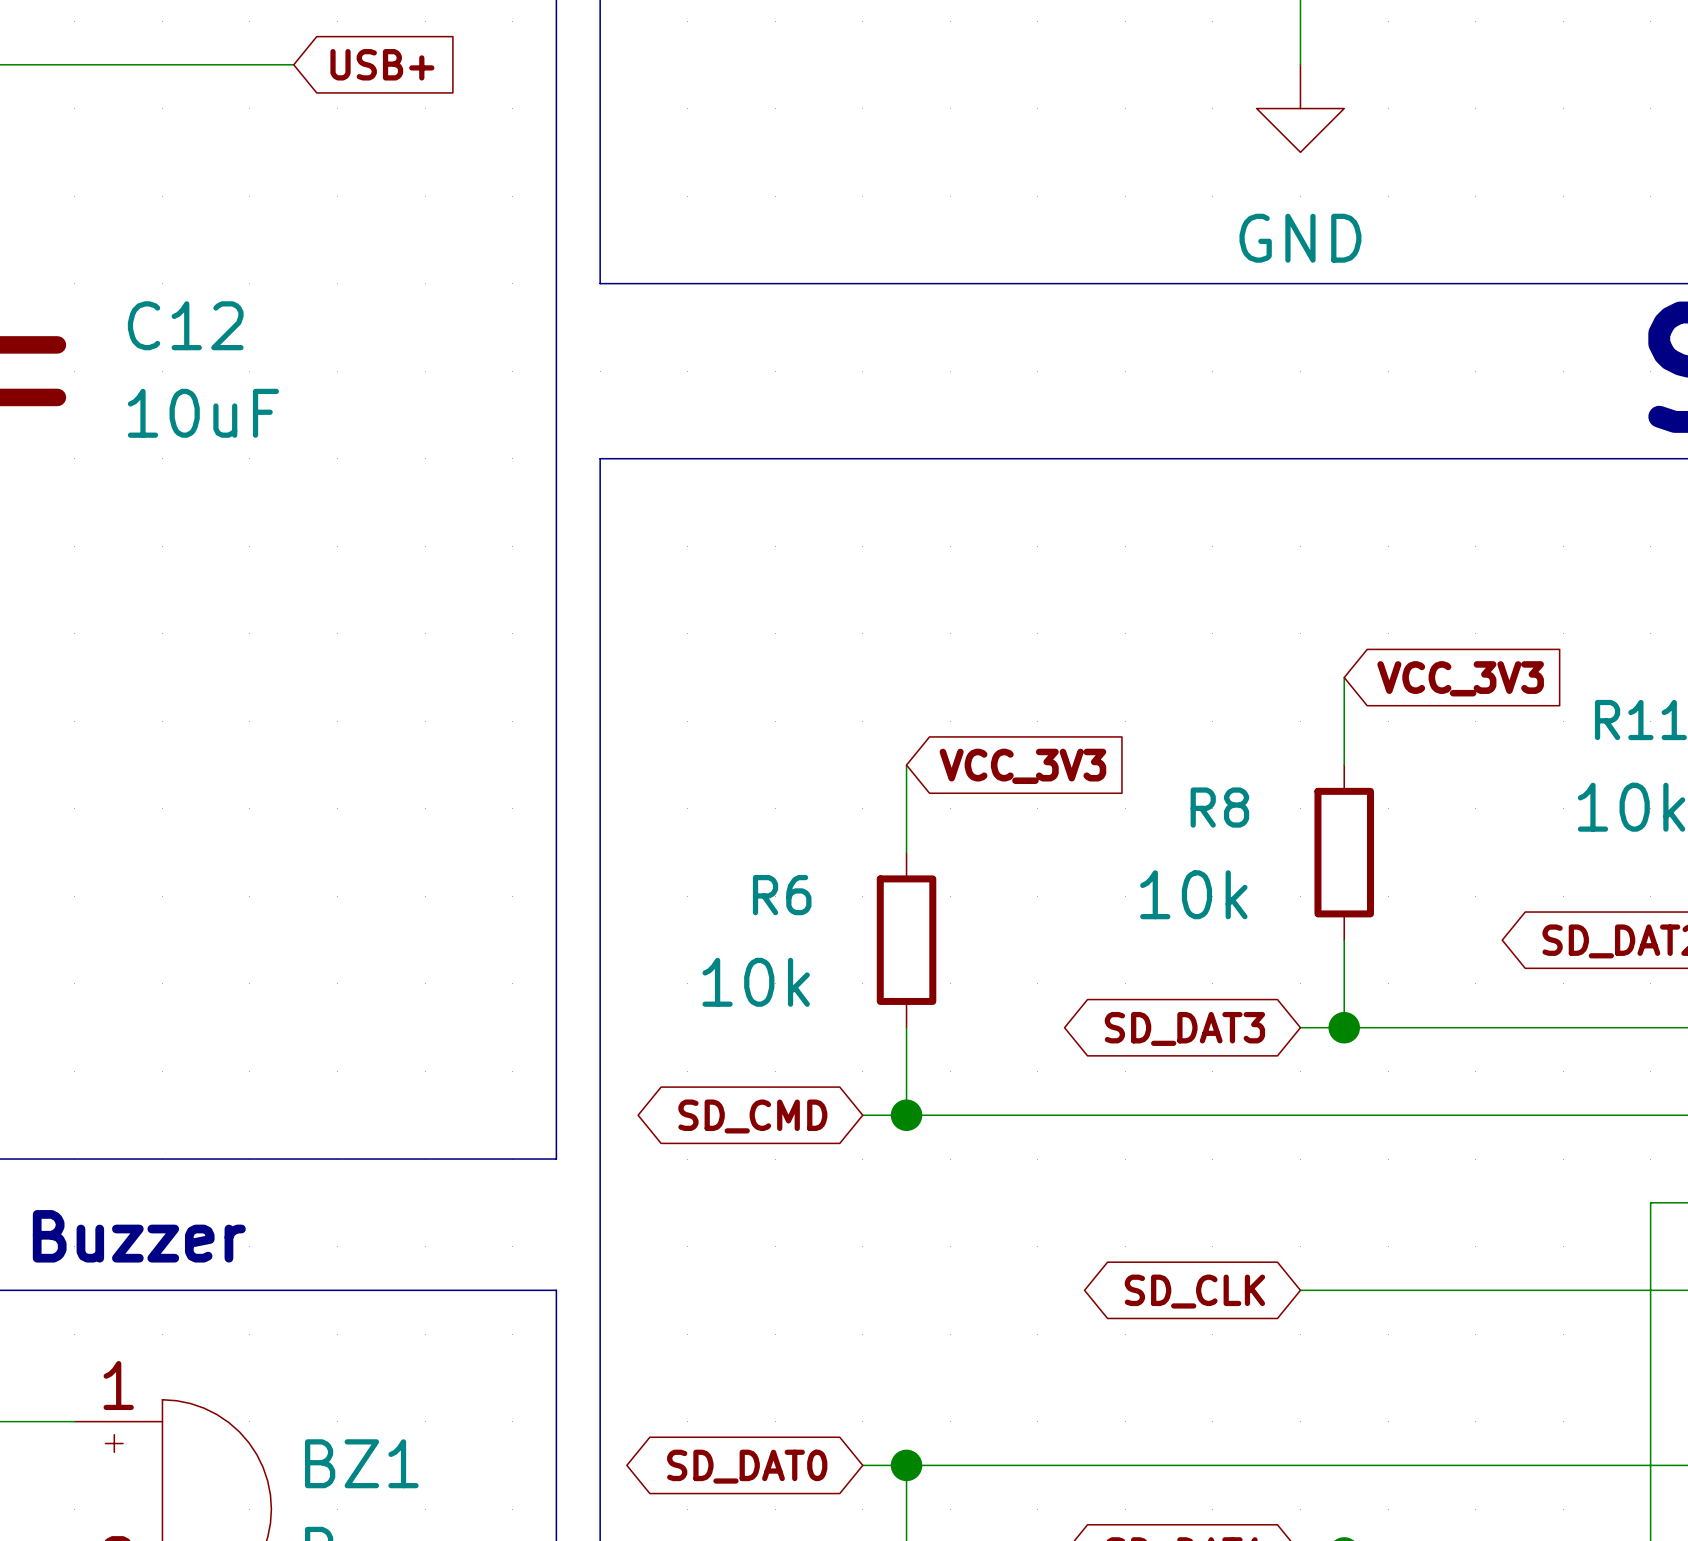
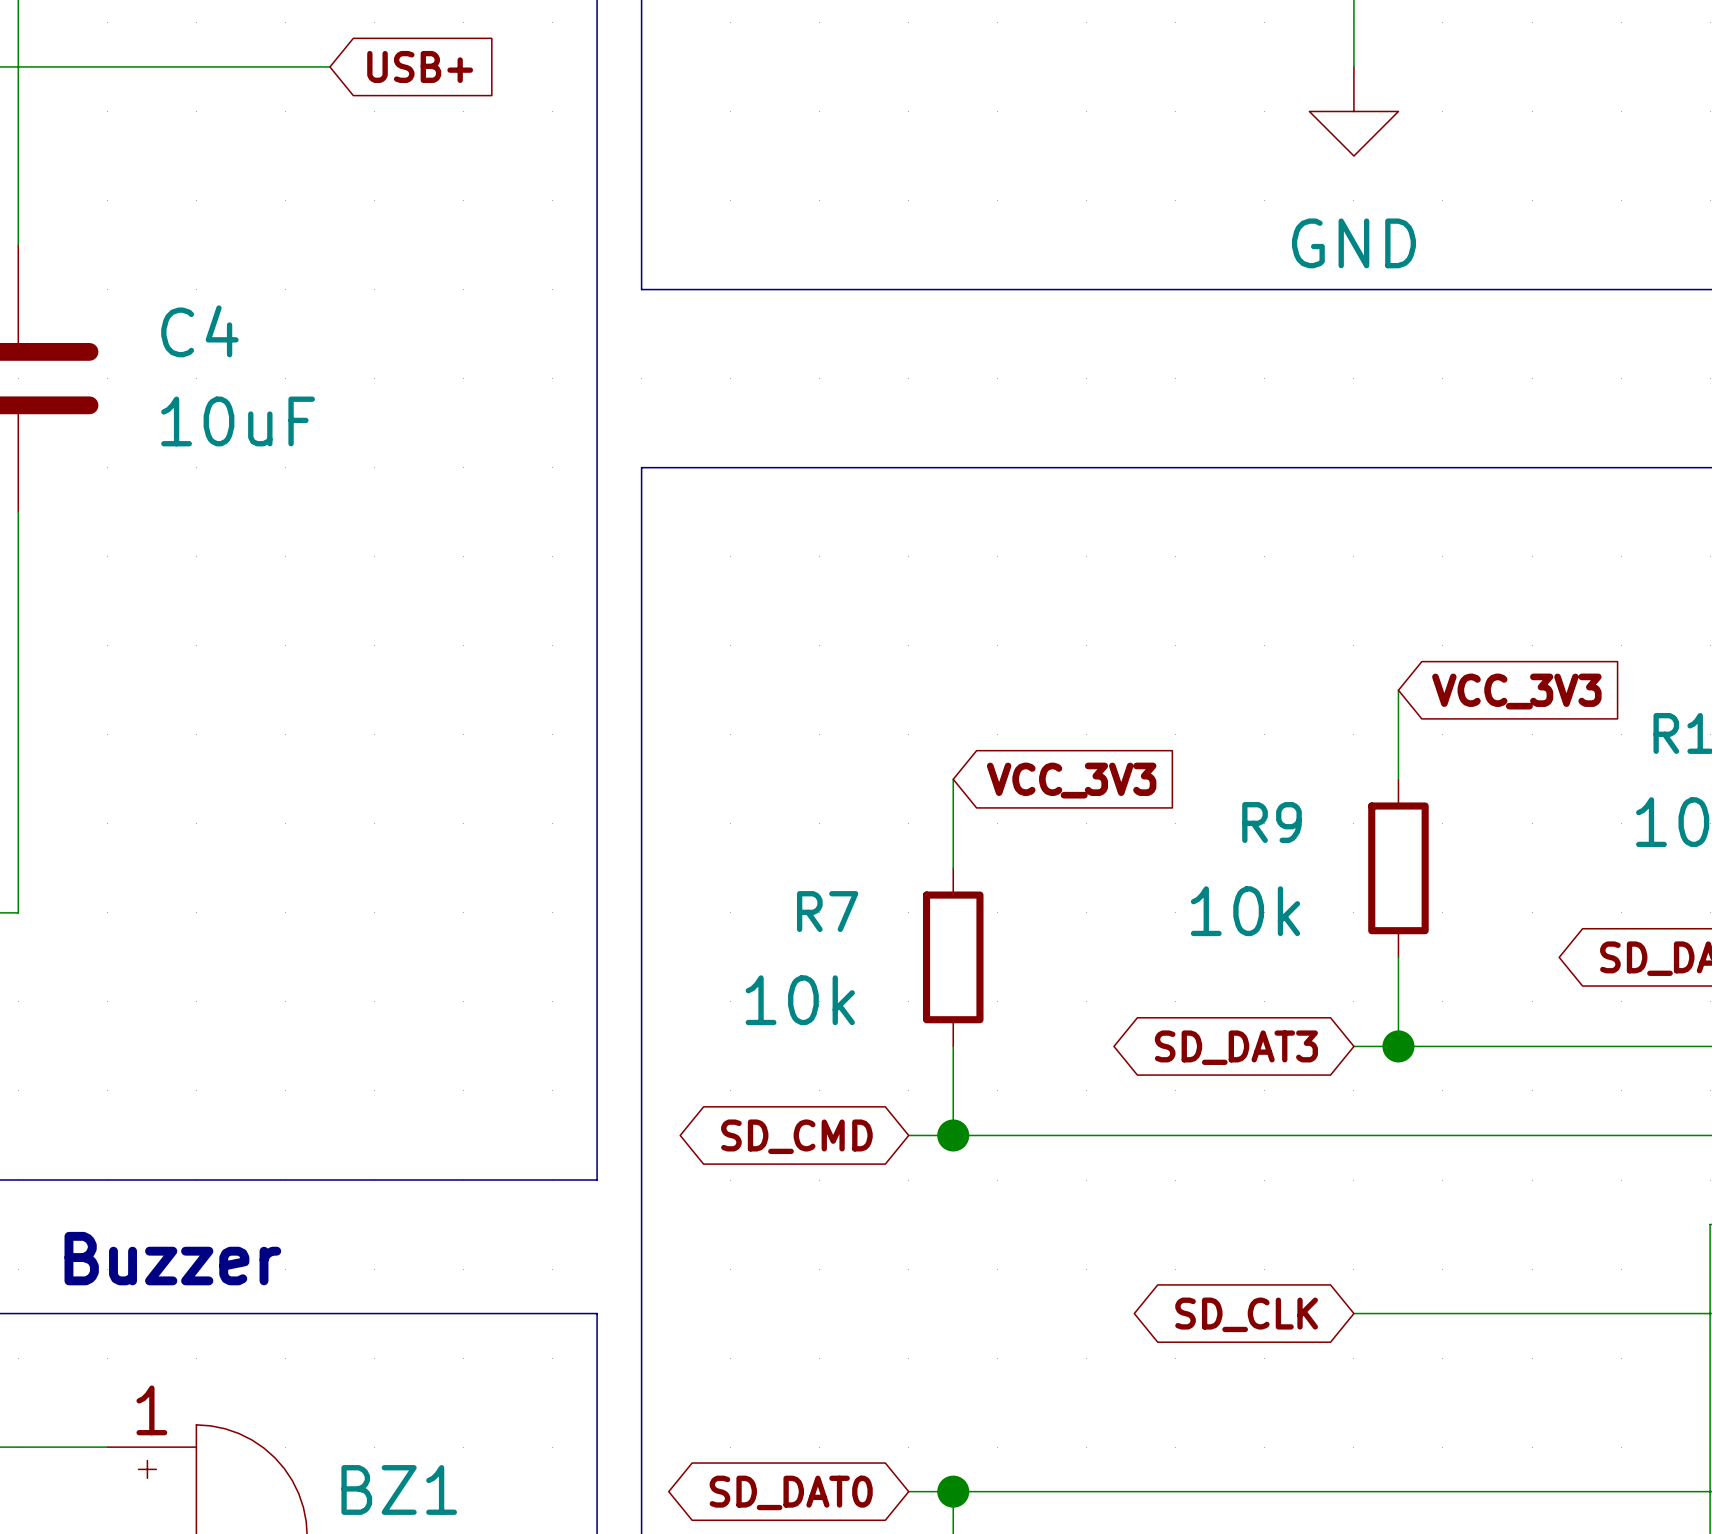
C12 name: C12 (185, 325) -> C4 (199, 331)
R8 name: R8 (1219, 807) -> R9 (1271, 822)
R6 name: R6 (782, 895) -> R7 (827, 911)

